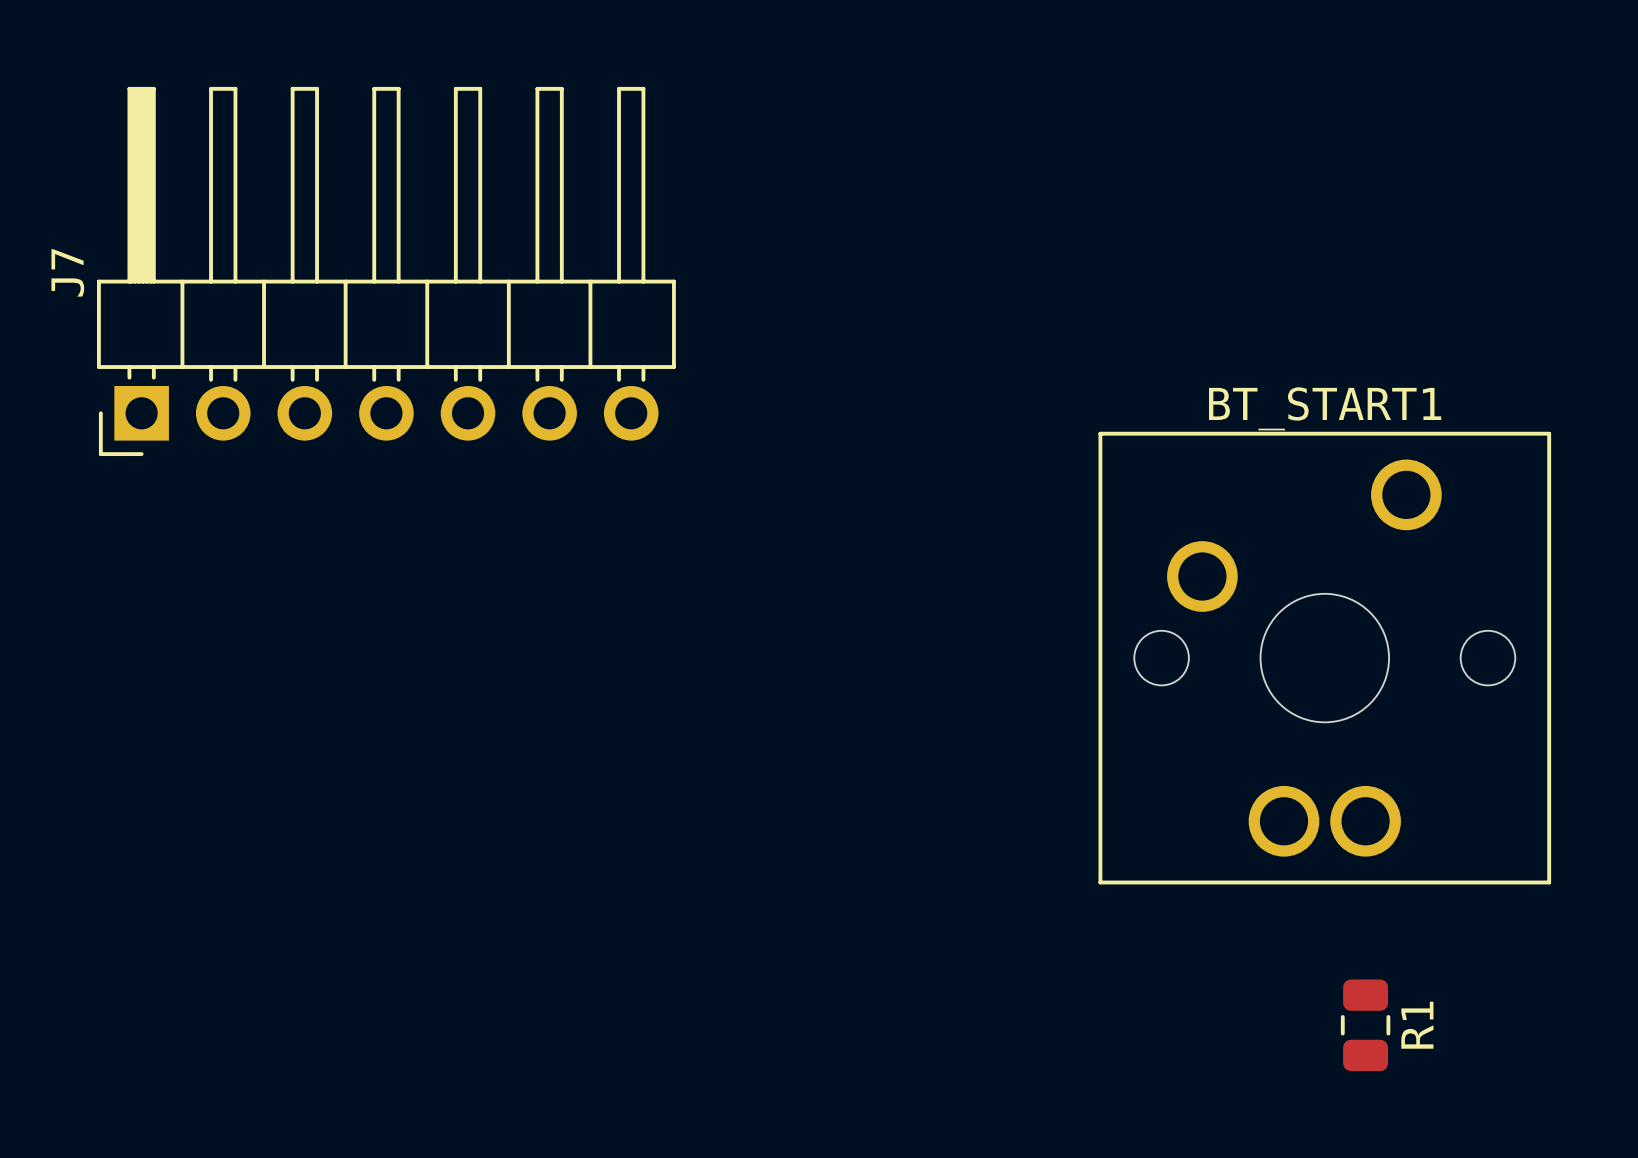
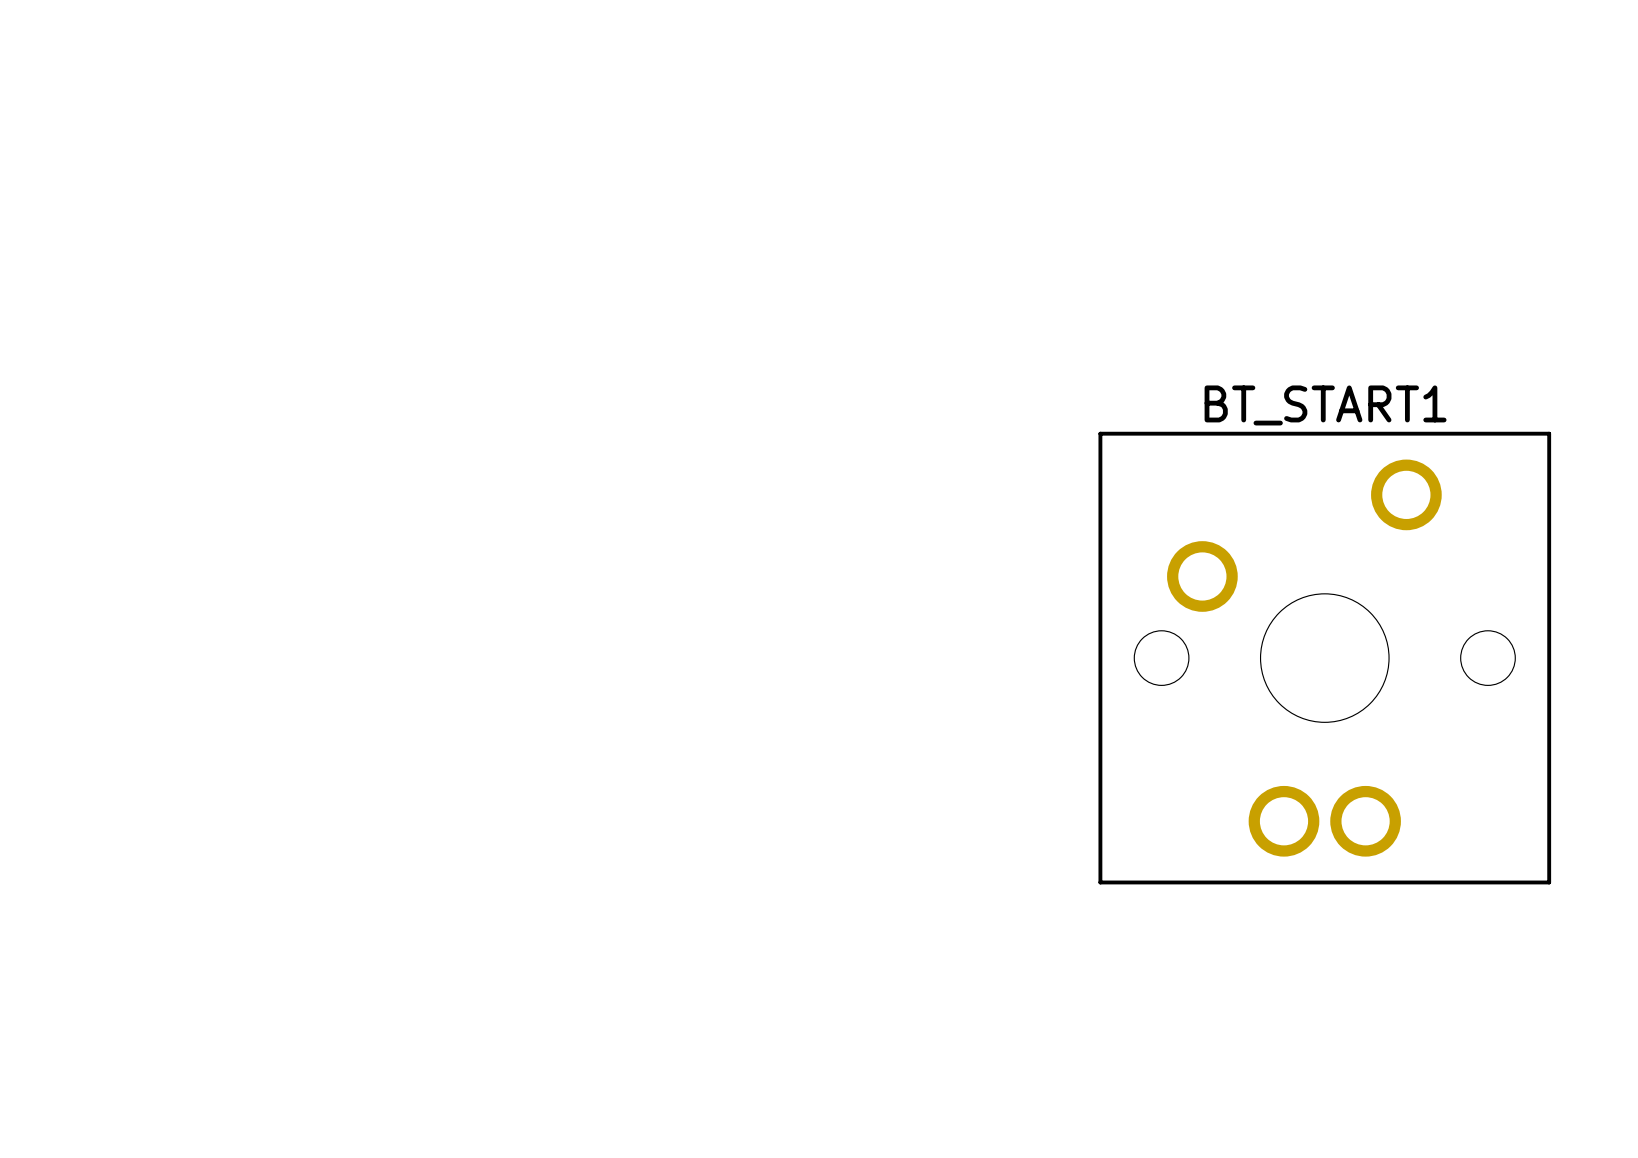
J7: (386, 271) -> none
R1: (1365, 1025) -> none

